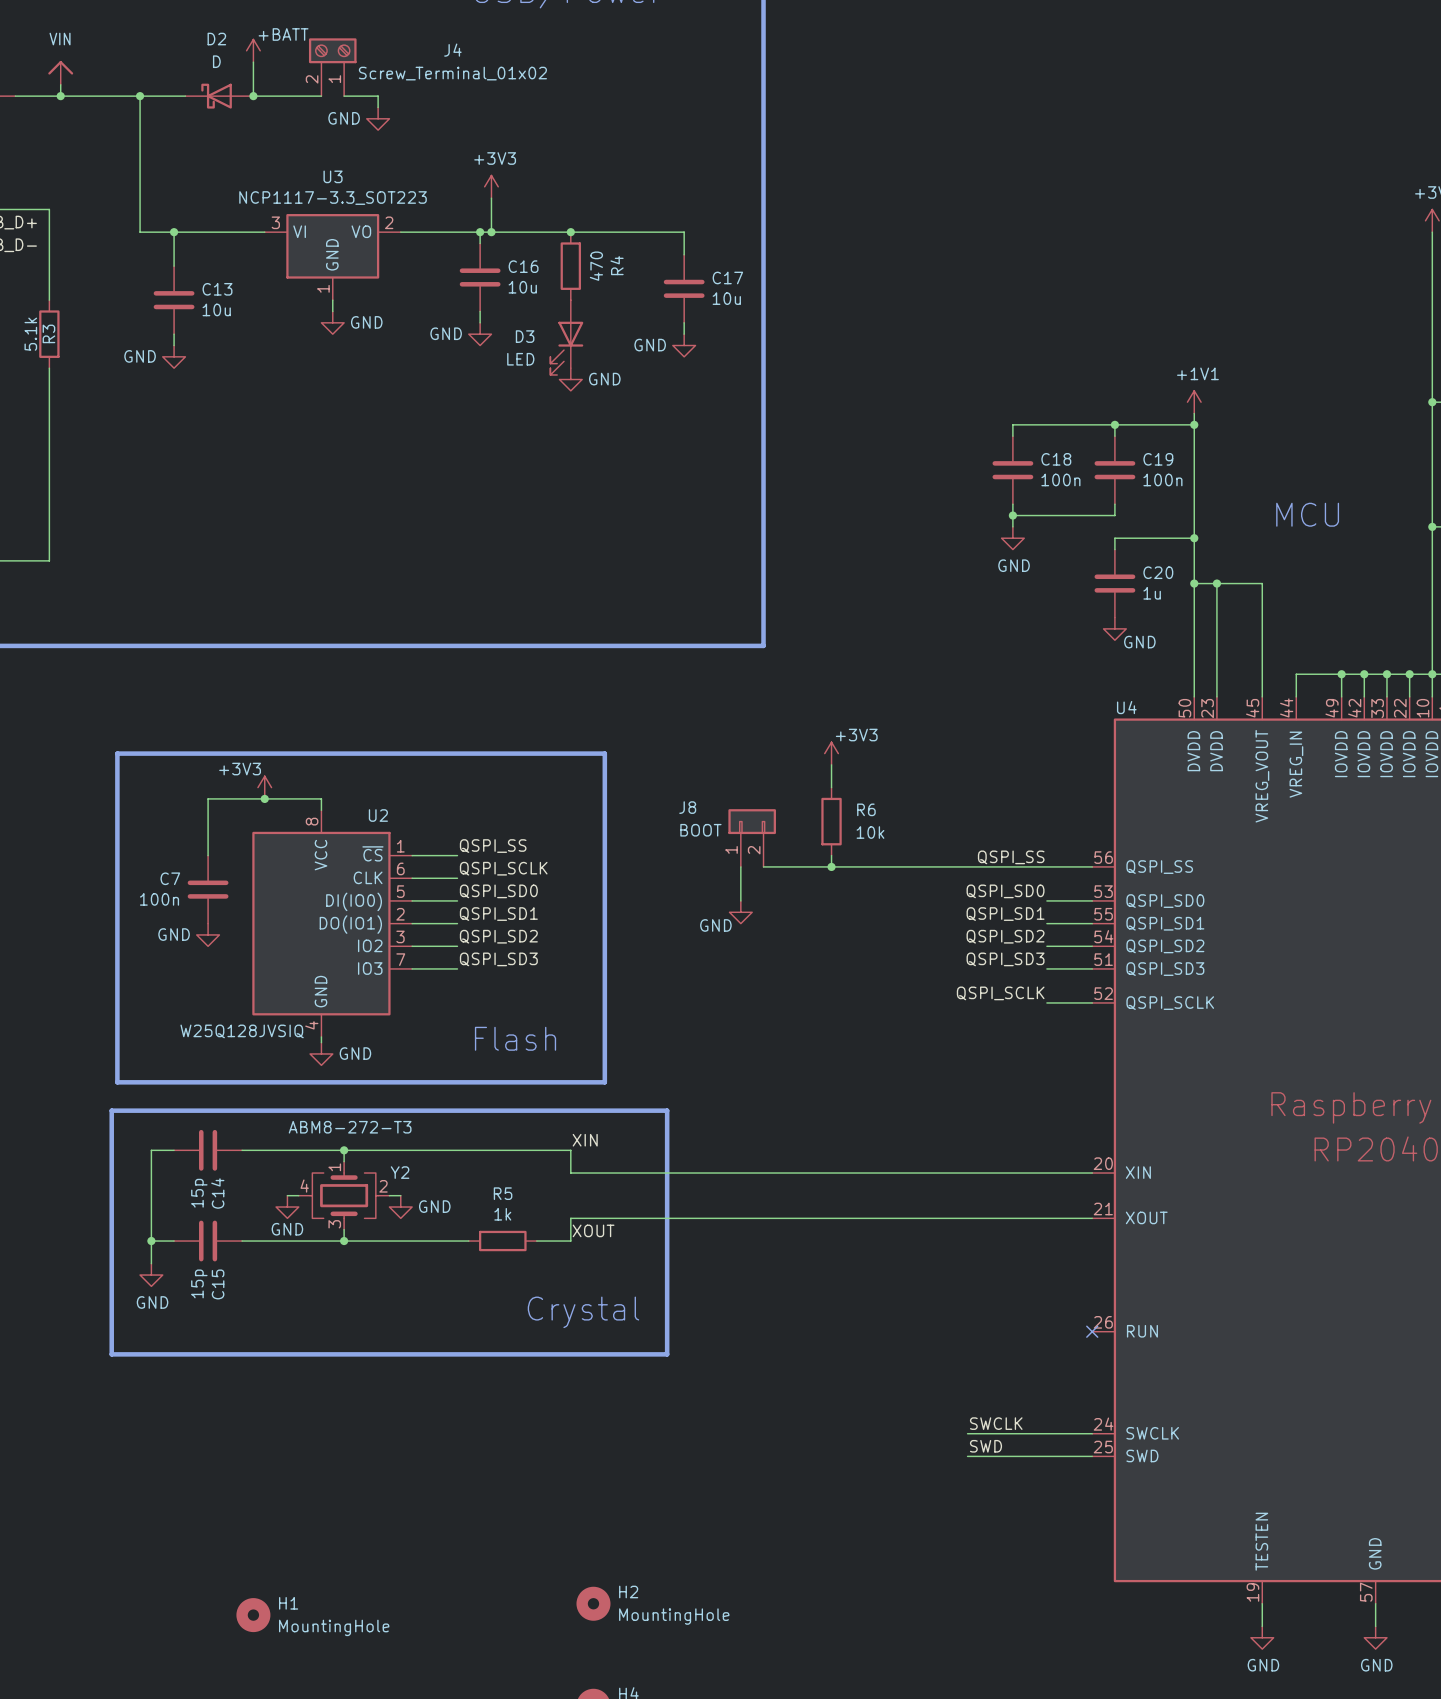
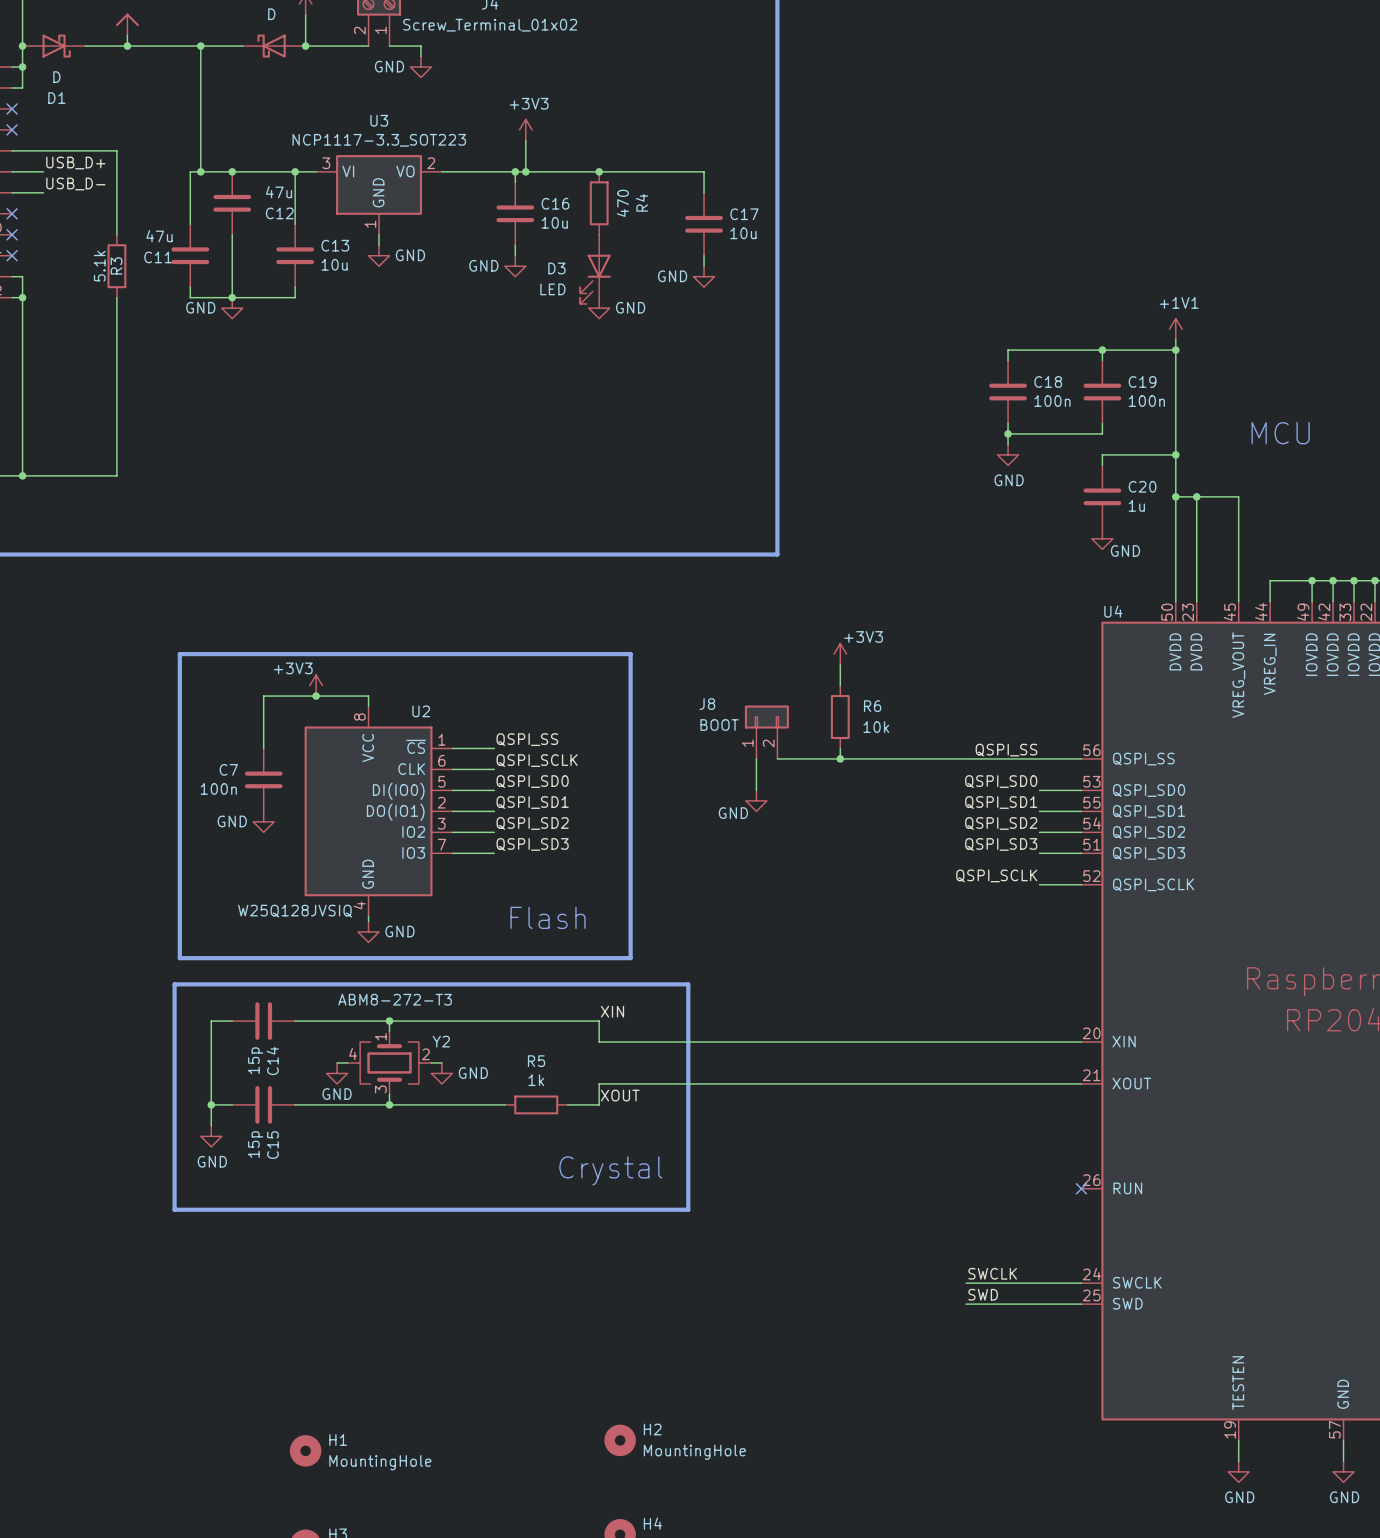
wire: none -> (200, 171) (190, 171) (190, 224)
junction: none -> (200, 171)
wire: none -> (295, 171) (295, 224)
junction: none -> (295, 171)
C12: none -> 47u (232, 203)
C13 position: (174, 300) -> (295, 255)
C11: none -> 47u (190, 255)
wire: none -> (190, 287) (190, 297) (295, 297) (295, 287)
power symbol position: GND (174, 356) -> GND (232, 308)
junction: none -> (232, 297)

